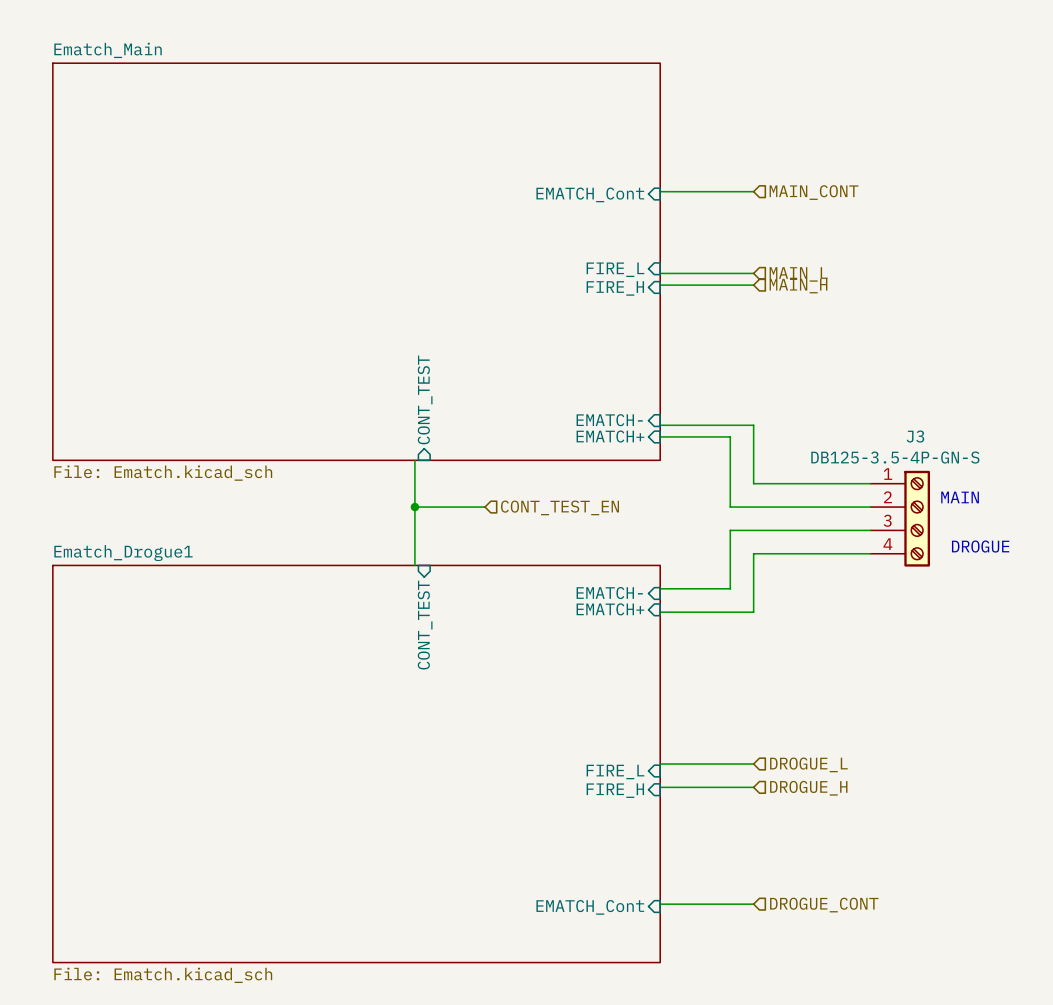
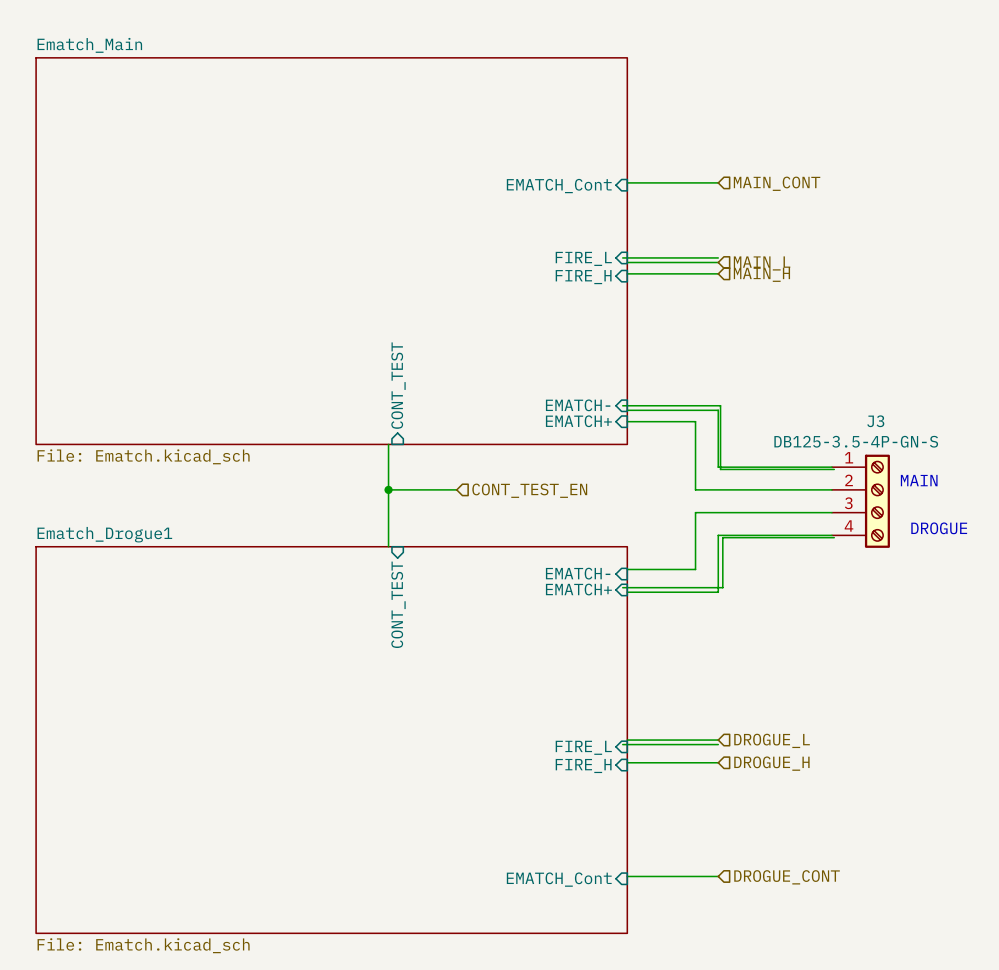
wire: none -> (622, 257) (718, 257)
wire: none -> (622, 405) (720, 405) (720, 469) (834, 469)
wire: none -> (834, 537) (722, 537) (722, 587) (622, 587)
wire: none -> (622, 744) (718, 744)

